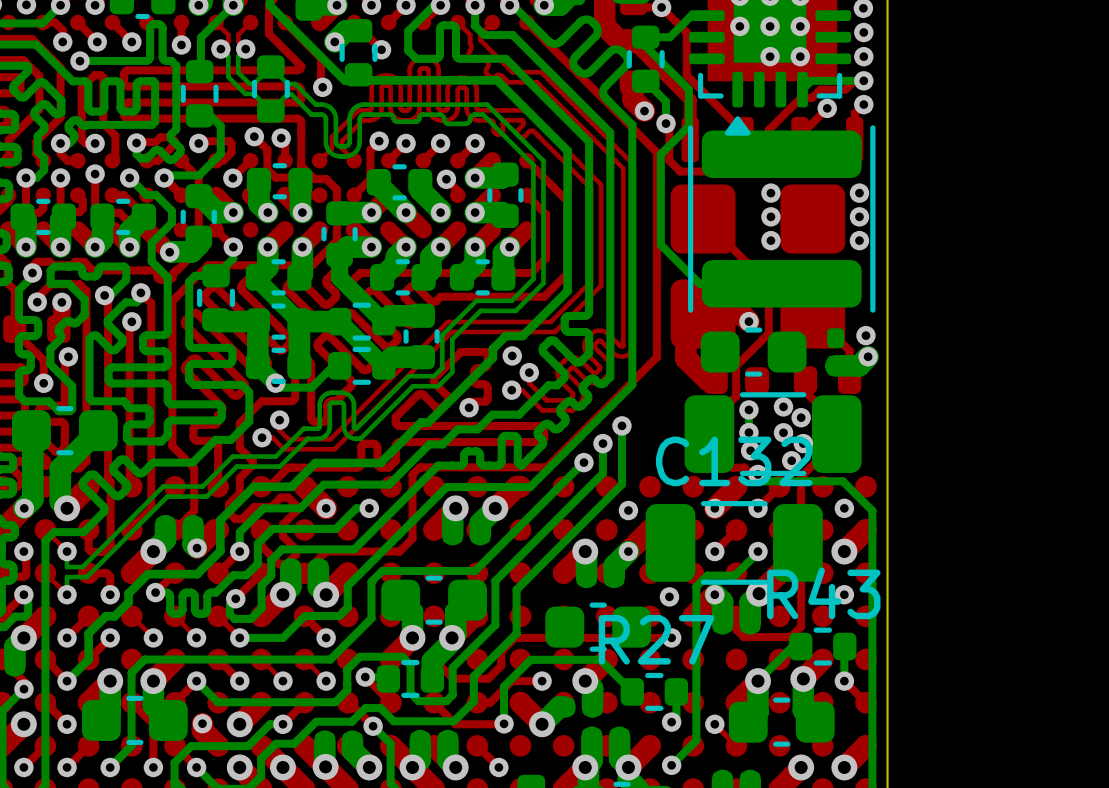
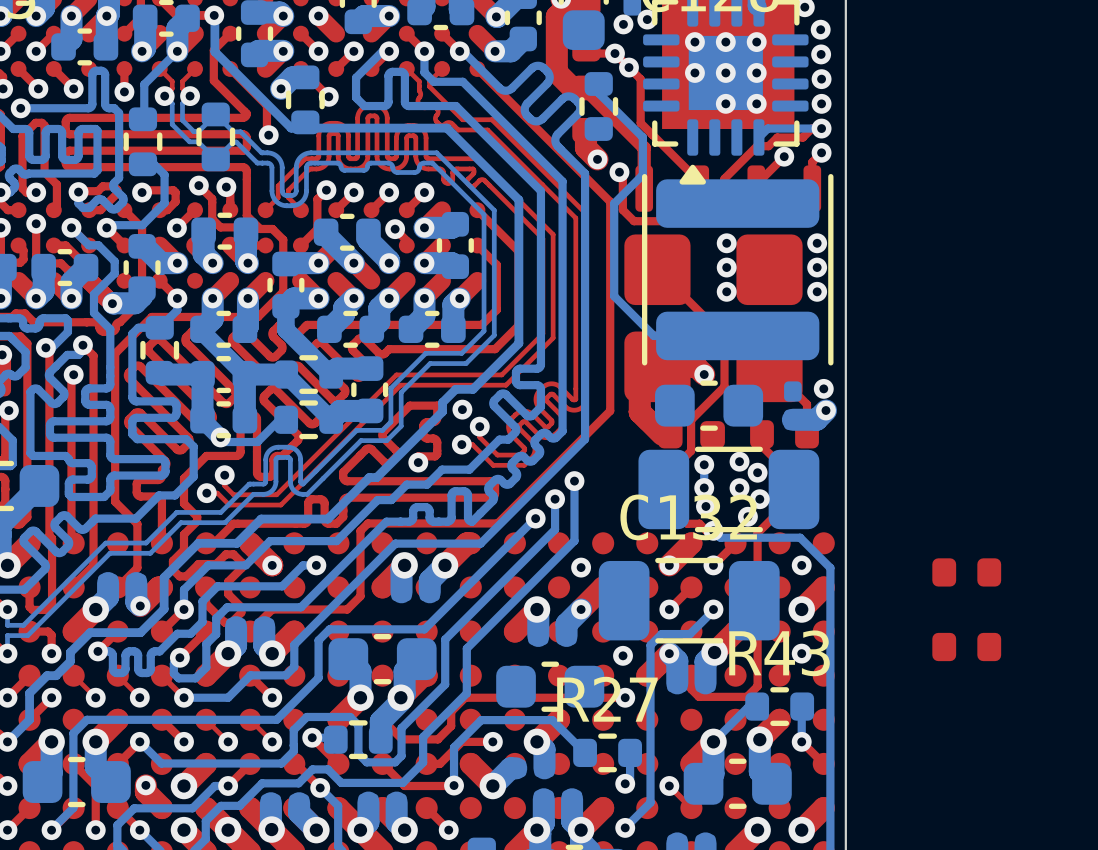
bottom track: (706, 15) (691, 15) (669, 37) (645, 37) -> none
via: none -> (628, 67)
bottom track: (645, 81) (665, 101) (665, 123) -> none
part: none -> (966, 572)
part: none -> (966, 647)

